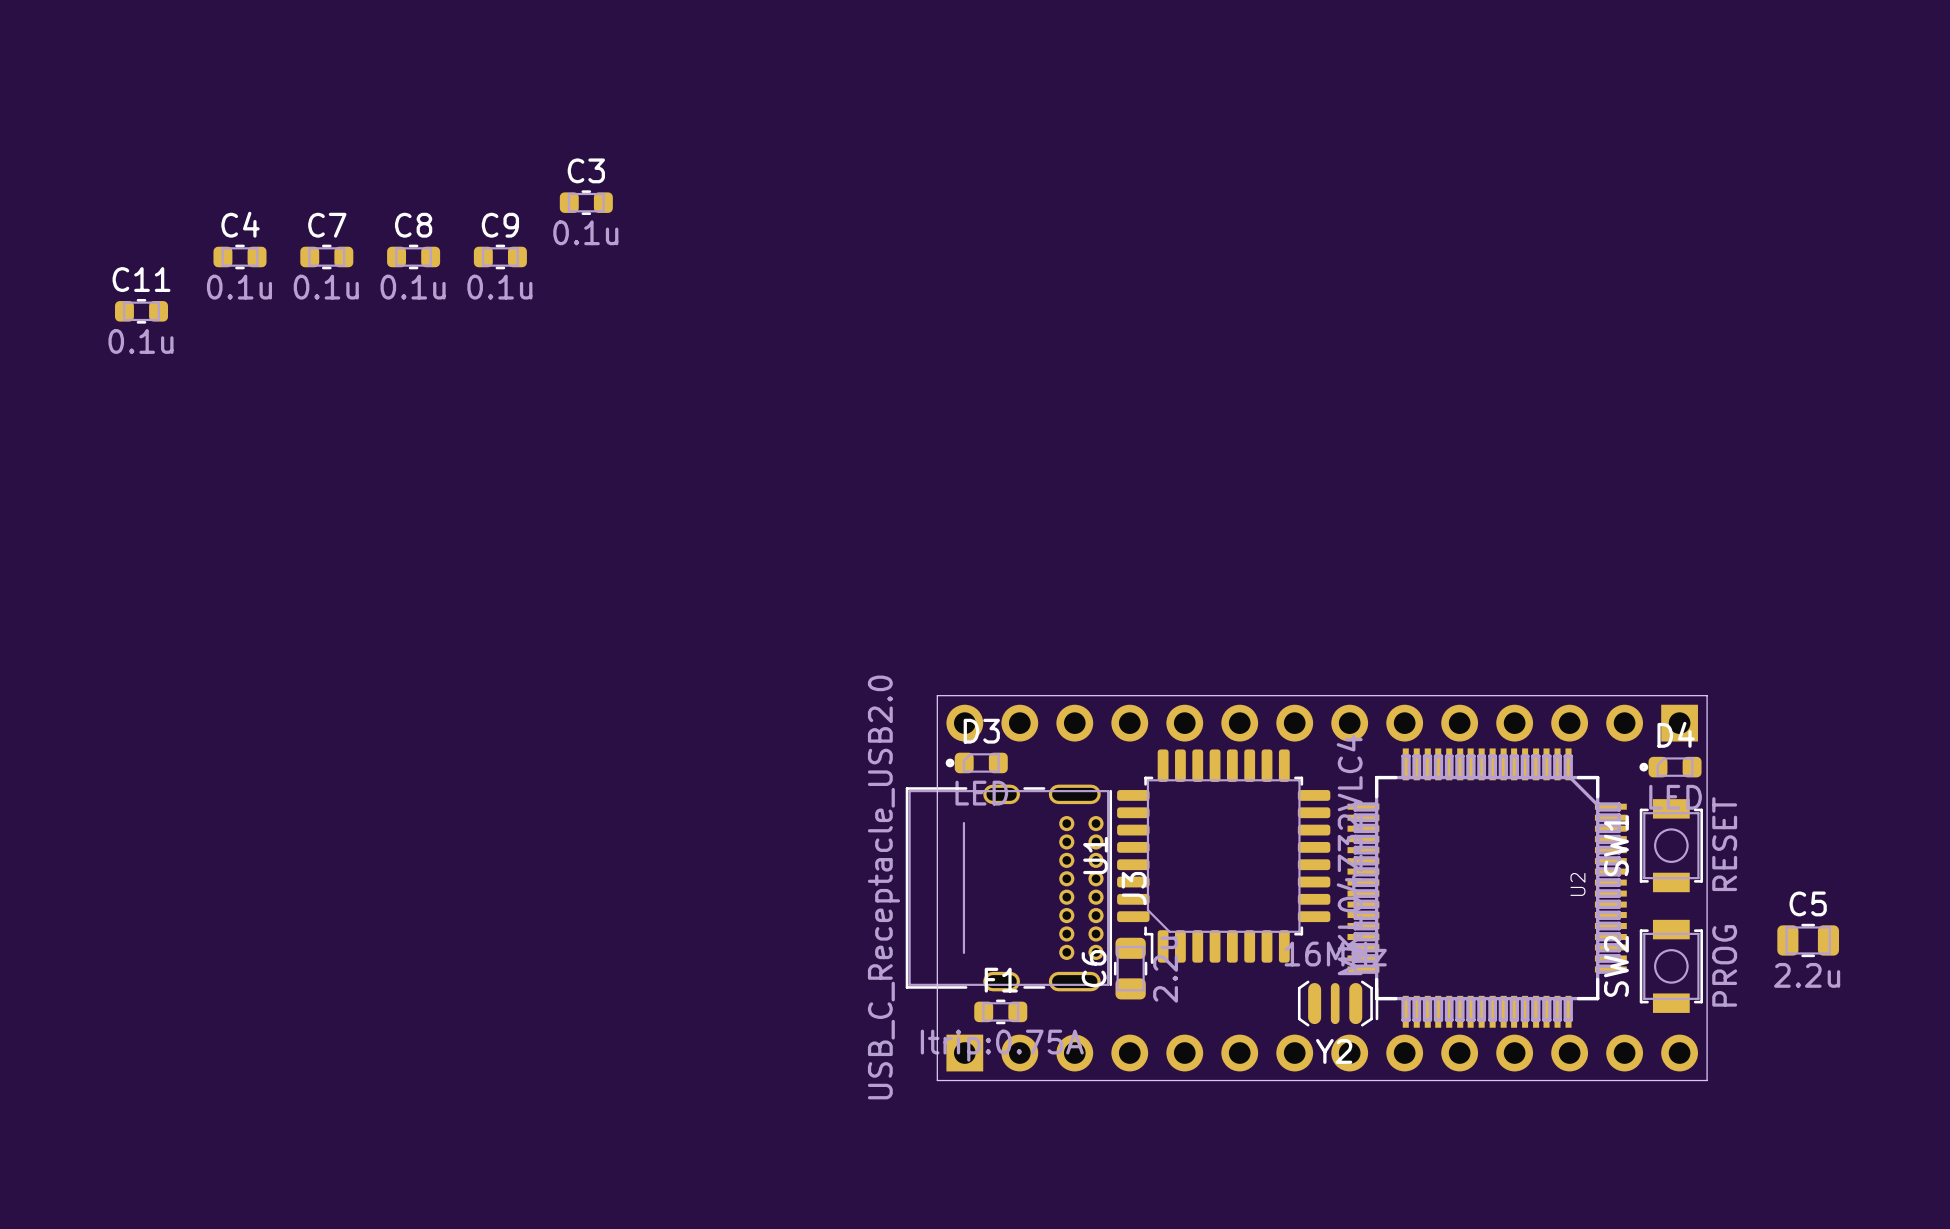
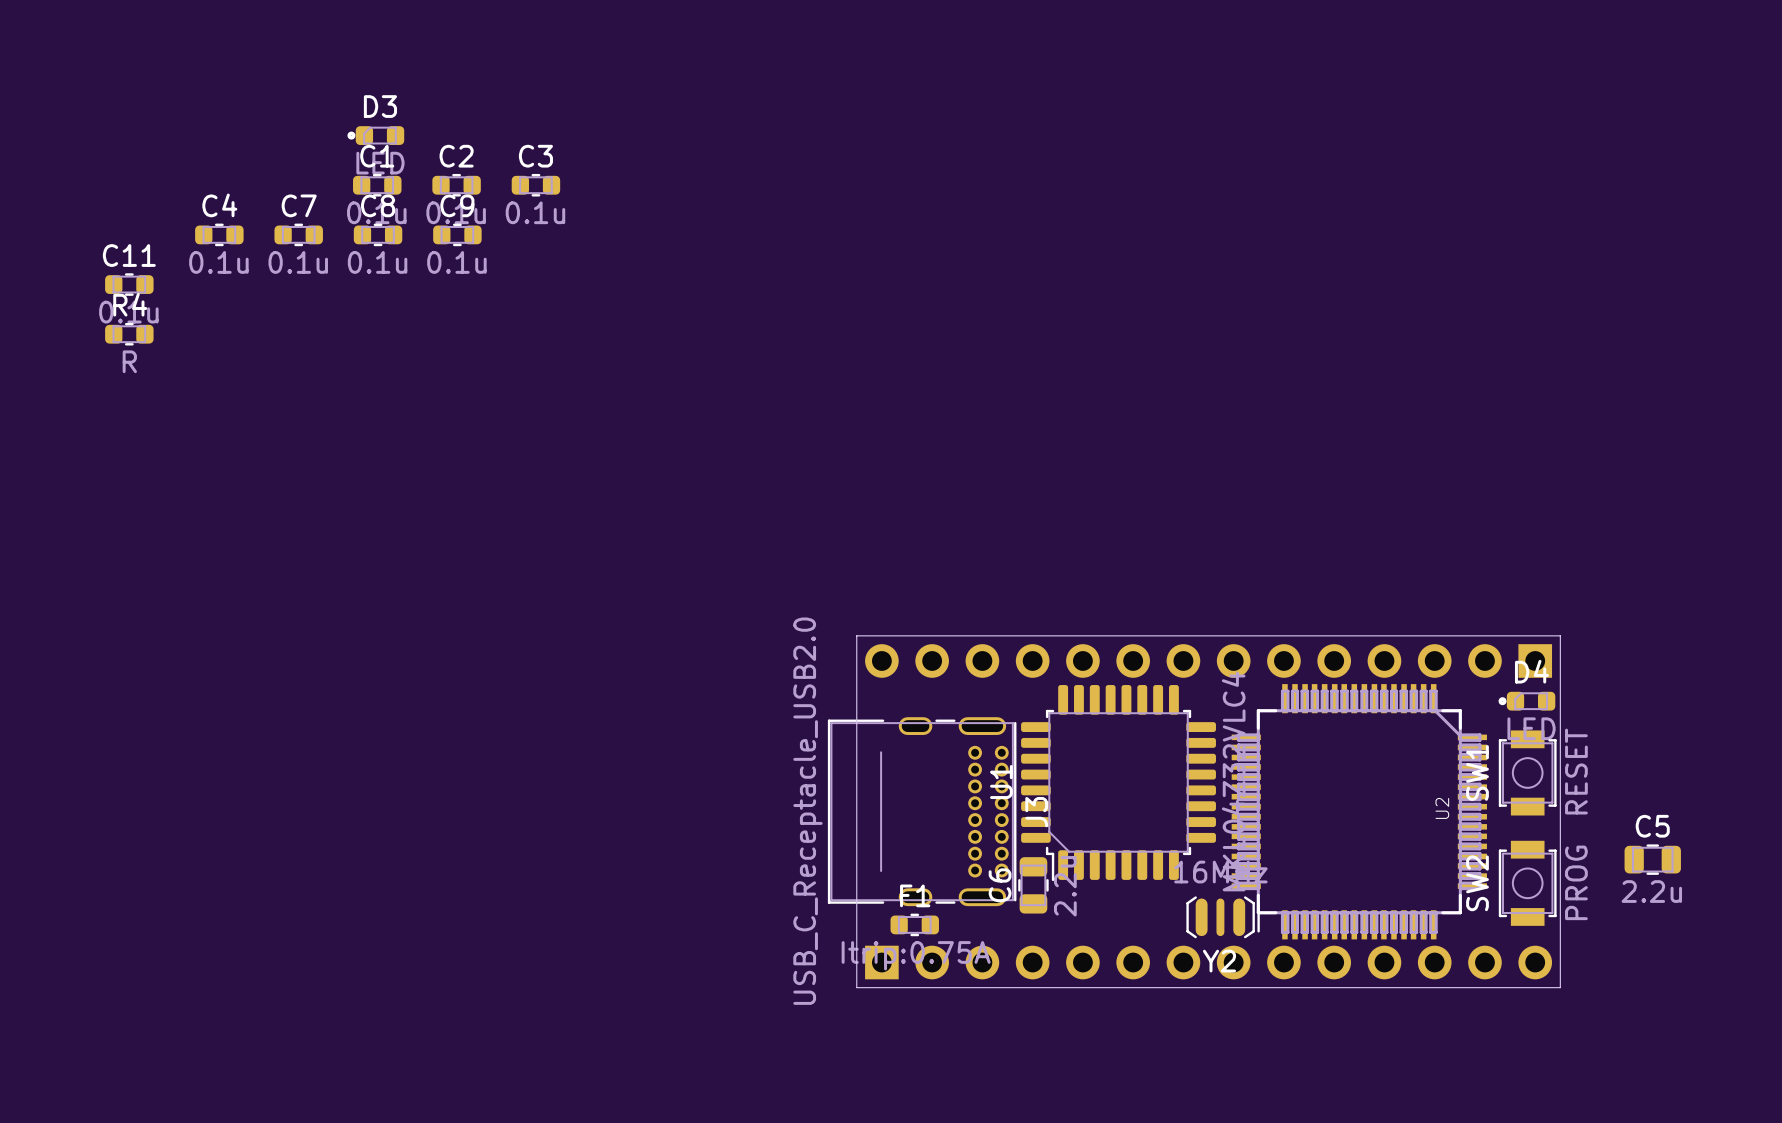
C1: none -> 0.1u (377, 185)
C2: none -> 0.1u (456, 185)
R4: none -> R (129, 334)
D3 position: (976, 762) -> (375, 135)

